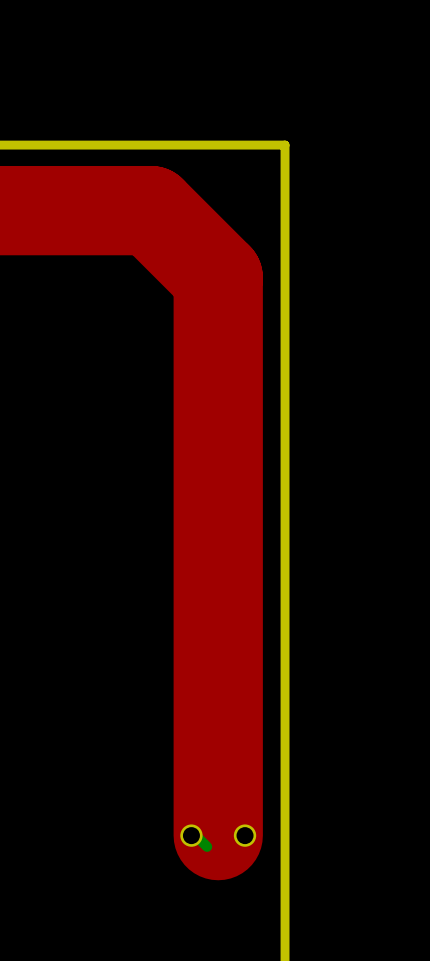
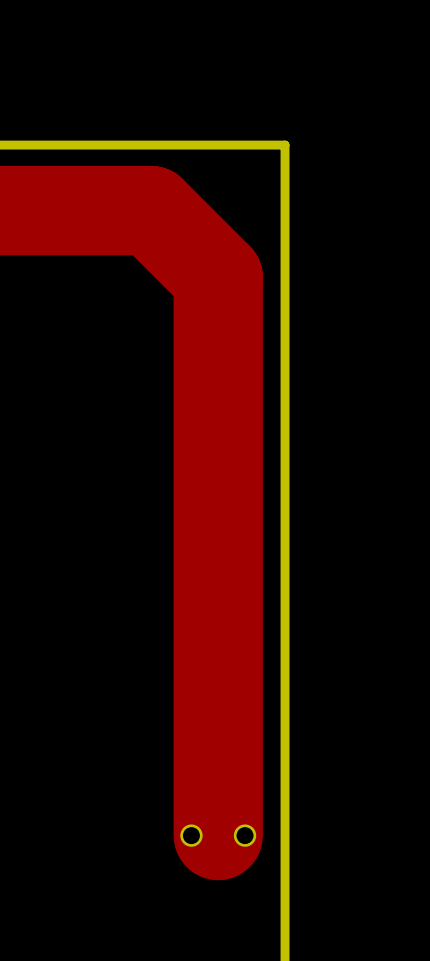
bottom track: (195, 835) (207, 846) -> none

